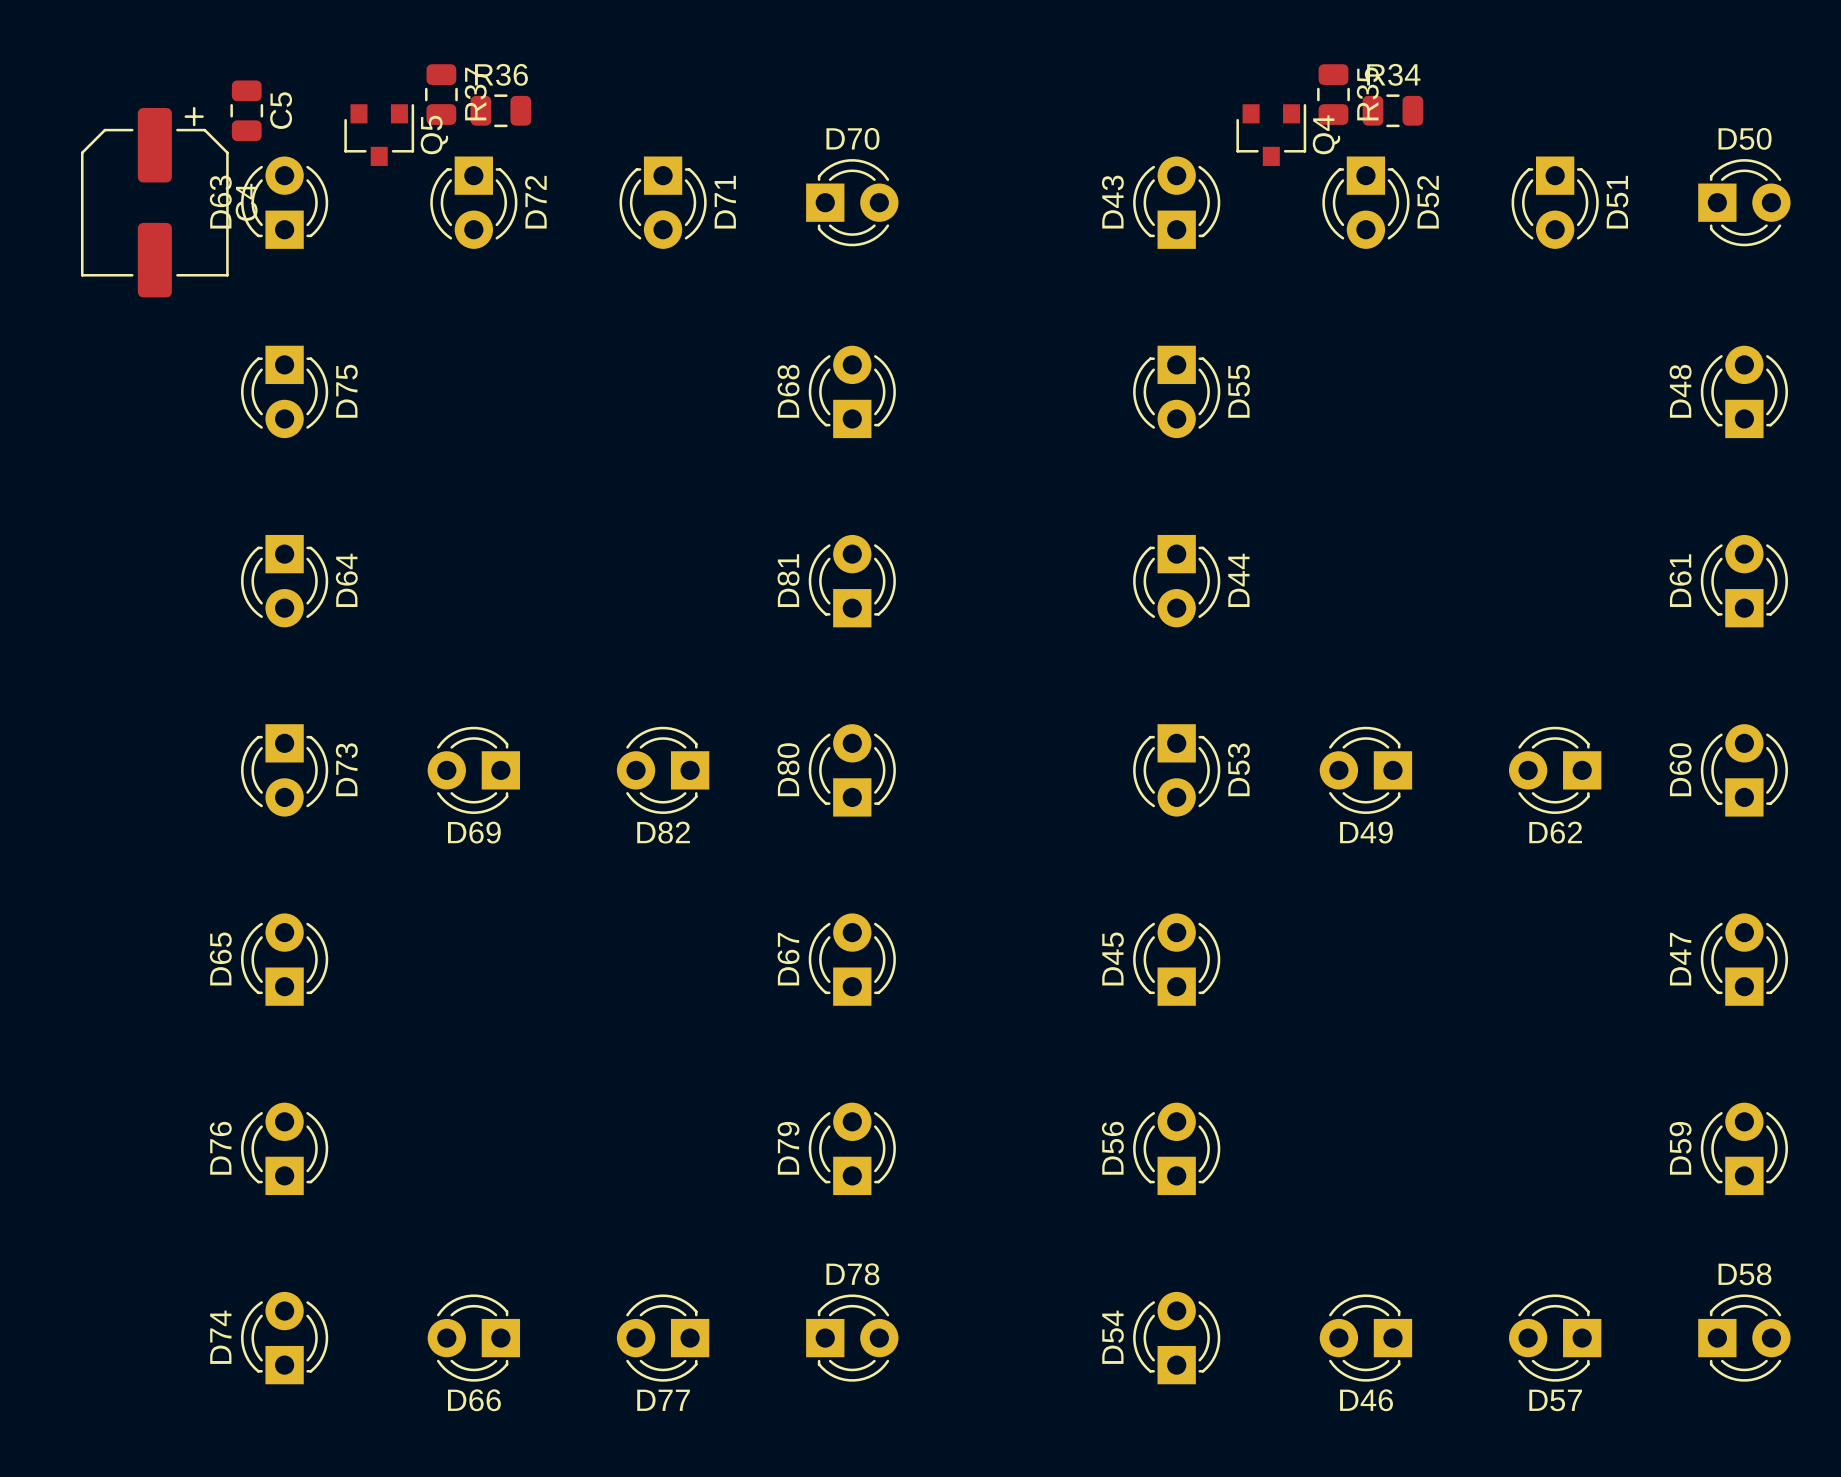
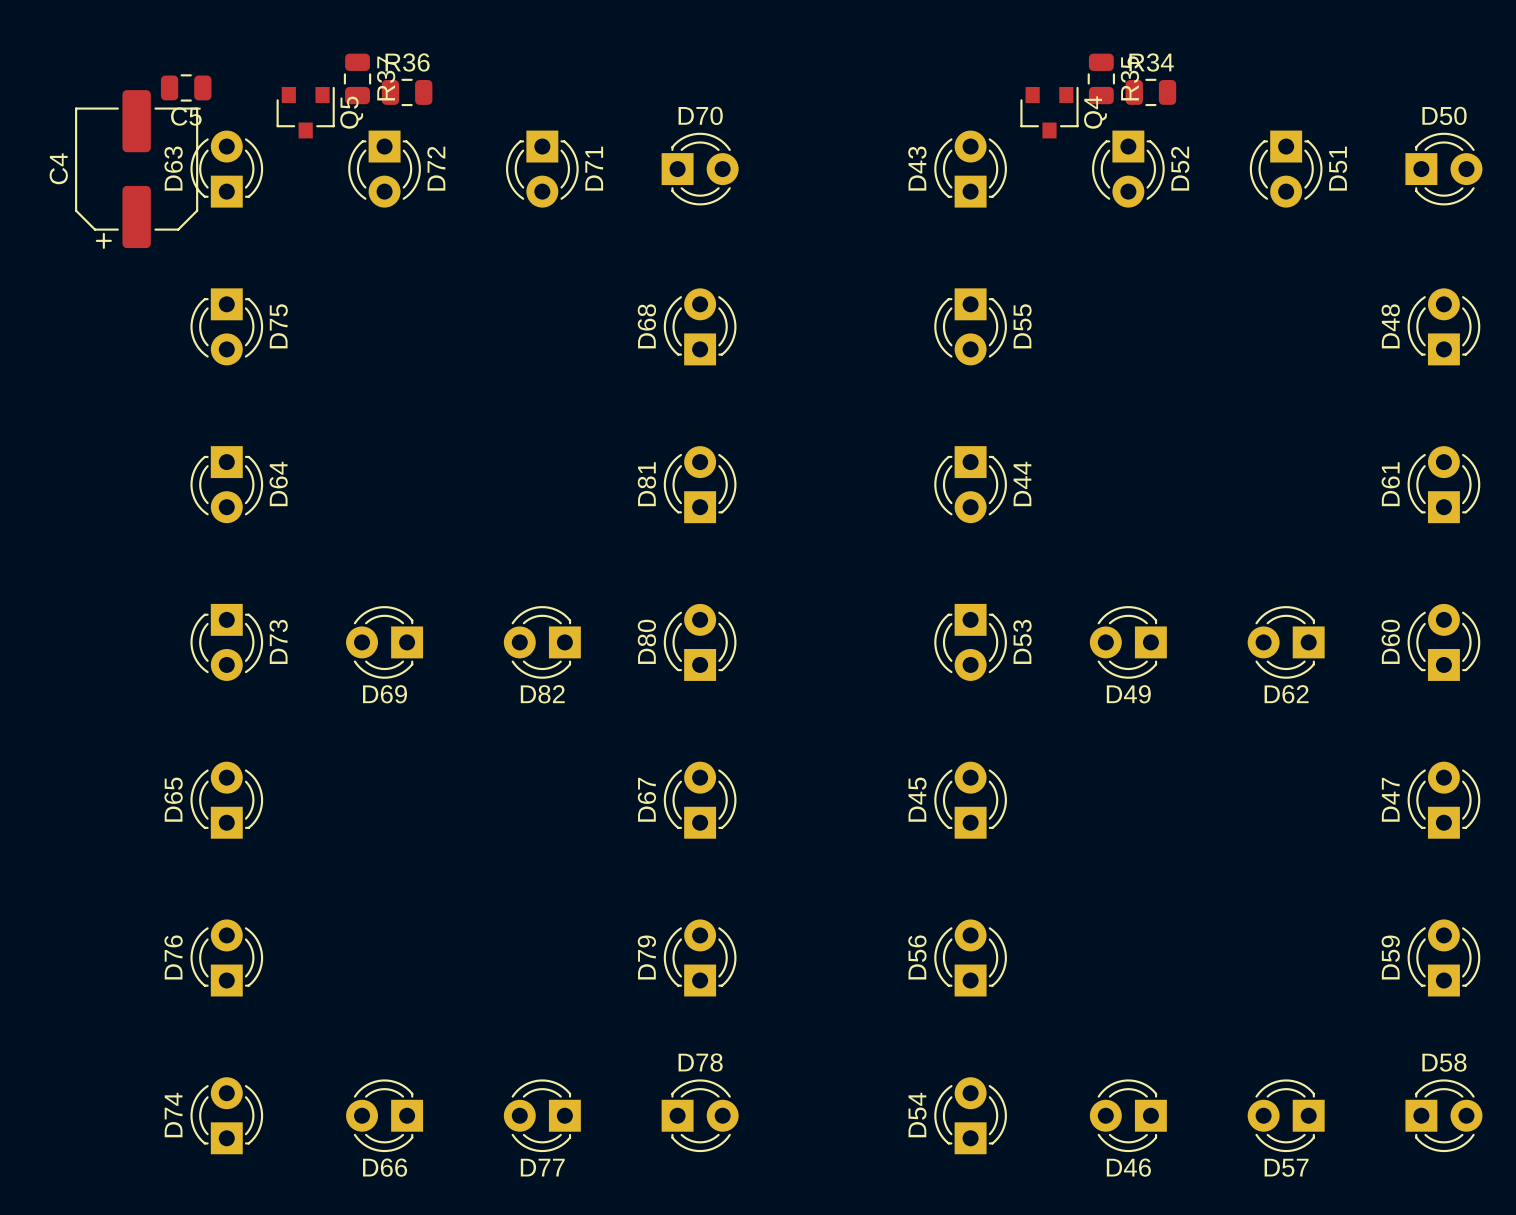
C5 rotation: 0° (246, 110) -> 90° clockwise (186, 87)
C4 rotation: 0° (154, 202) -> 180° (136, 169)

